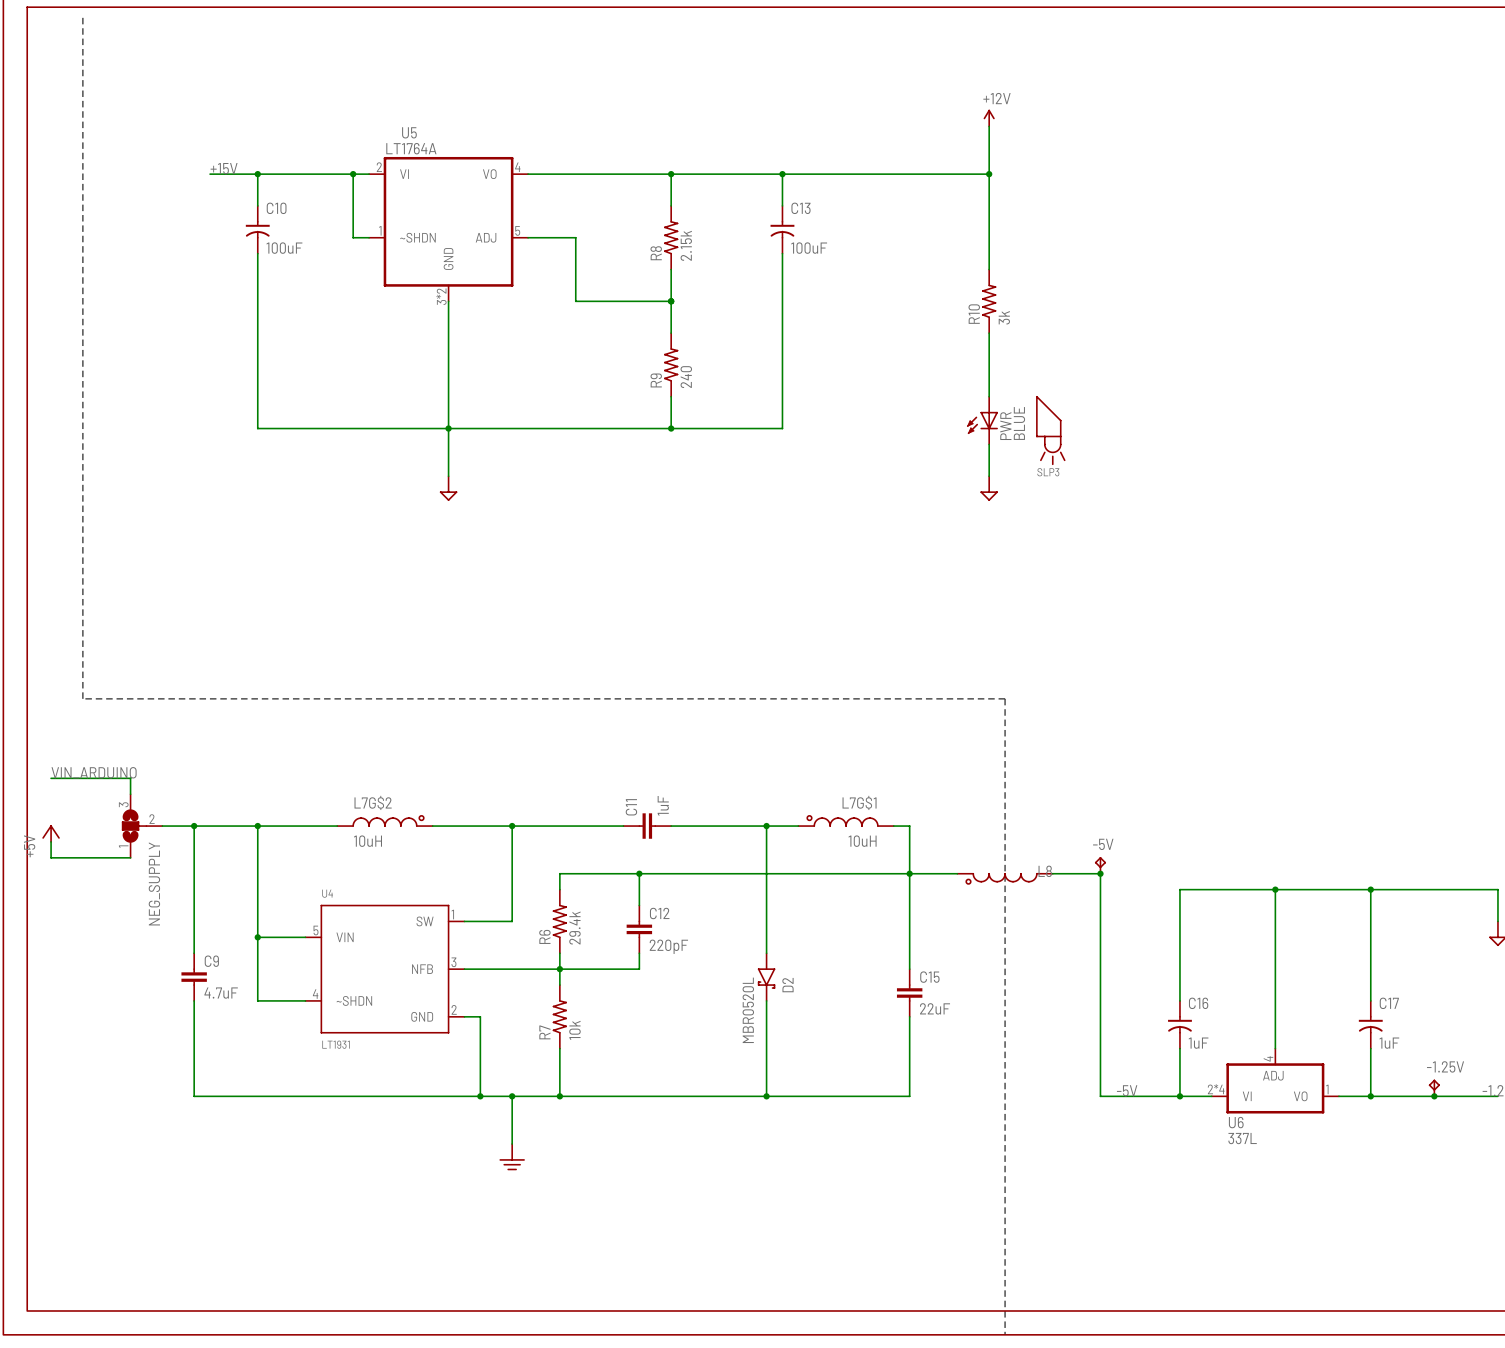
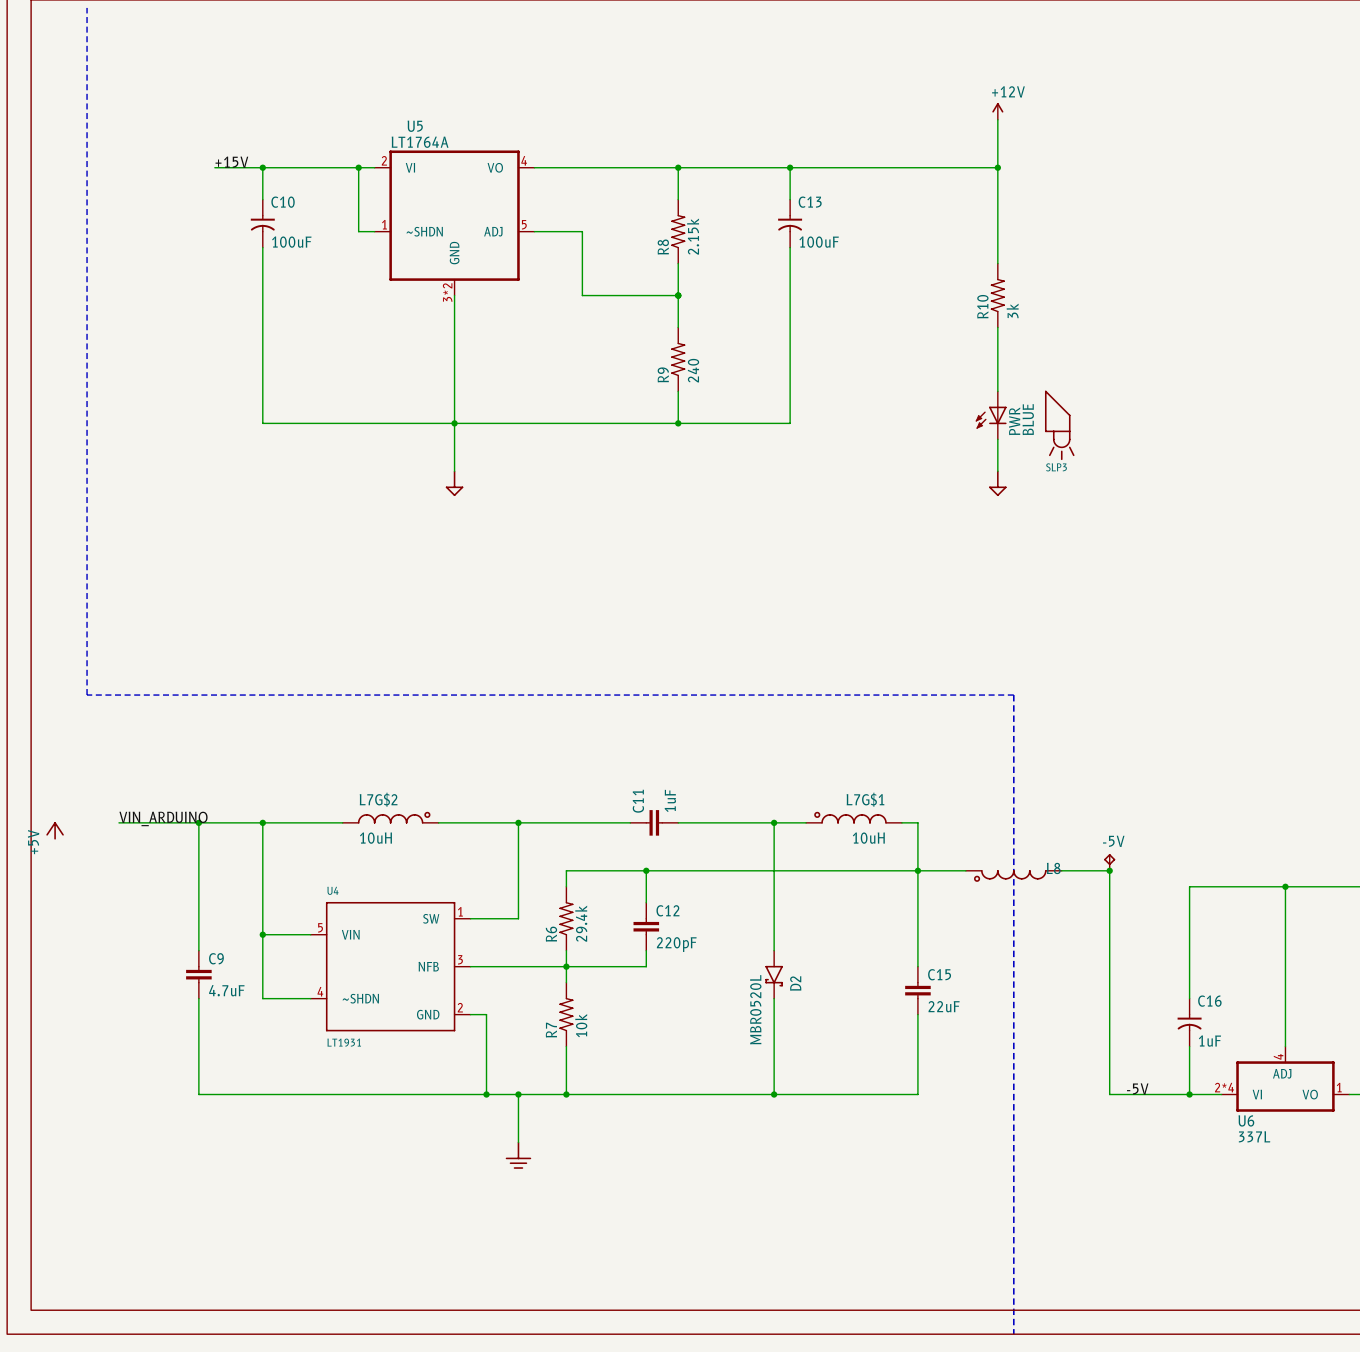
label position: VIN_ARDUINO (94, 772) -> VIN_ARDUINO (163, 818)
wire: (51, 778) (130, 778) (130, 794) -> none
NEG_SUPPLY: (142, 826) -> none
wire: (51, 841) (51, 857) (130, 857) -> none

